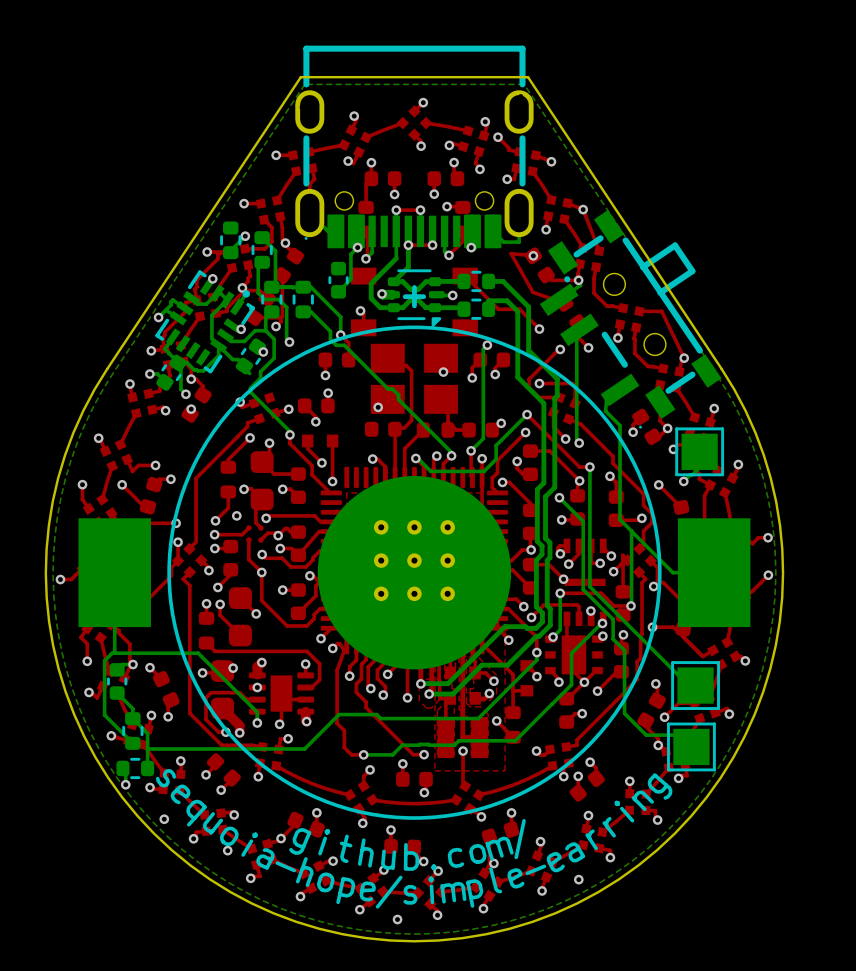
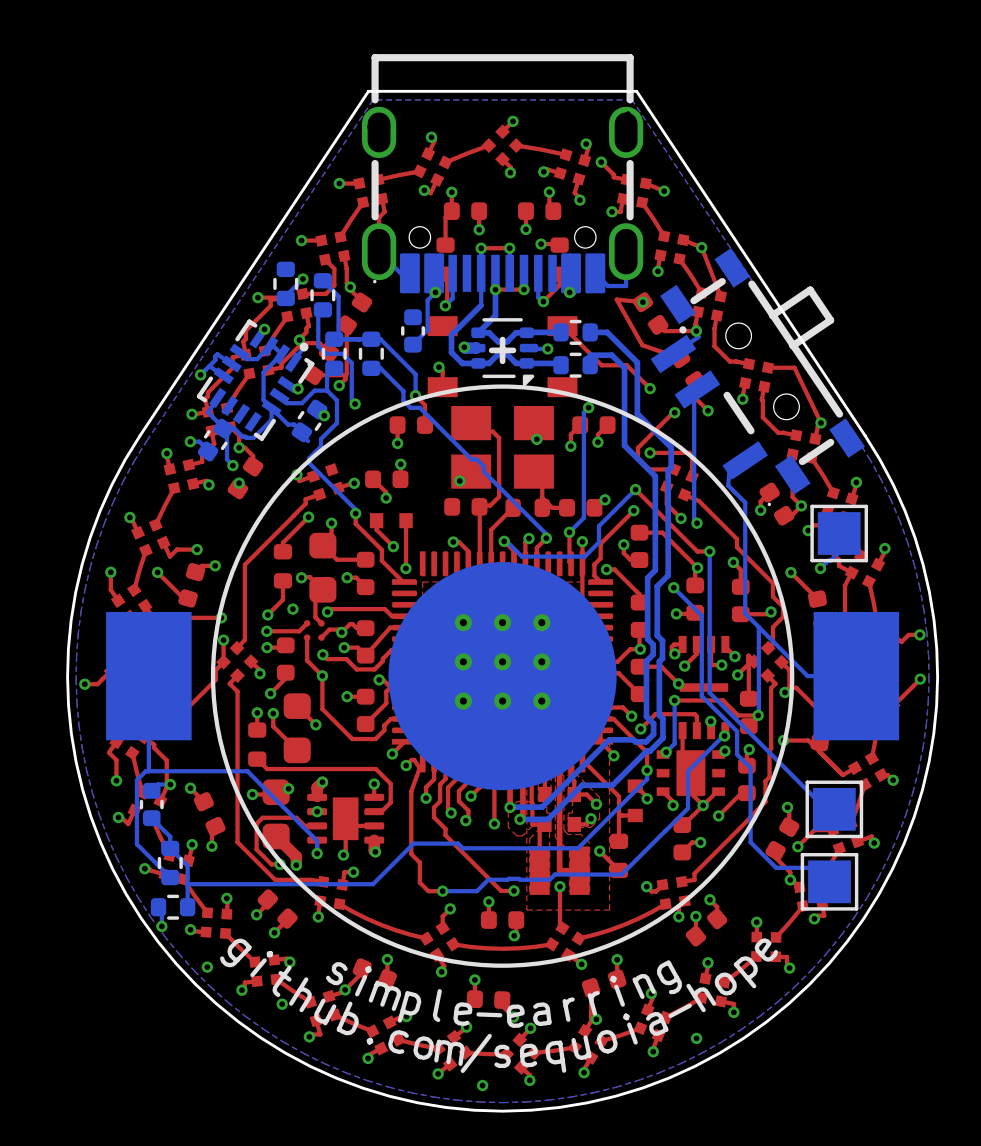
text rotation: 0° (165, 778) -> 21.3° counterclockwise (336, 973)
text position: s (165, 778) -> s (336, 973)
text rotation: 0° (660, 786) -> 19.9° clockwise (669, 977)
text position: g (660, 786) -> g (669, 977)
text: e (180, 794) -> none
text rotation: 0° (642, 800) -> 20.6° clockwise (644, 986)
text position: n (642, 800) -> n (644, 986)
text: none -> e (766, 950)
text: i (624, 811) -> none
text rotation: 0° (196, 813) -> 50.7° counterclockwise (555, 1056)
text position: q (196, 813) -> q (555, 1056)
text: none -> i (261, 964)
text rotation: 0° (212, 823) -> 10.9° counterclockwise (325, 1012)
text position: u (212, 823) -> u (325, 1012)
text: none -> p (745, 972)
text: r (609, 827) -> none
text: none -> i (363, 981)
text: none -> o (725, 984)
text: o (229, 836) -> none
text: none -> i (617, 991)
text: / (520, 839) -> none
text: r (591, 839) -> none
text rotation: 0° (300, 841) -> 20.9° clockwise (235, 952)
text position: g (300, 841) -> g (235, 952)
text: i (324, 842) -> m (384, 995)
text: i (249, 844) -> h (300, 994)
text: none -> h (701, 997)
text rotation: 0° (346, 848) -> 21.8° clockwise (282, 981)
text position: t (346, 848) -> t (282, 981)
text: m (499, 848) -> none
text: none -> r (593, 1003)
text: h (365, 852) -> none
text rotation: 0° (575, 852) -> 5.9° clockwise (657, 1023)
text rotation: 0° (477, 853) -> 3.3° counterclockwise (607, 1041)
text: none -> r (568, 1009)
text: b (411, 856) -> none
text rotation: 0° (455, 857) -> 24.2° clockwise (398, 1042)
text position: c (455, 857) -> c (398, 1042)
text: a (265, 859) -> none
text: none -> e (462, 1014)
text: u (388, 859) -> none
text: none -> - (489, 1014)
text: none -> a (542, 1014)
text: none -> e (515, 1016)
text: e (555, 862) -> none
text: - (285, 866) -> b (347, 1018)
text: . (433, 867) -> none
text rotation: 0° (535, 869) -> 5.7° counterclockwise (680, 1010)
text: h (304, 872) -> . (369, 1041)
text: e (515, 878) -> i (630, 1029)
text rotation: 0° (495, 880) -> 25.7° clockwise (437, 1005)
text position: l (495, 880) -> l (437, 1005)
text rotation: 0° (325, 882) -> 4° counterclockwise (423, 1048)
text rotation: 0° (345, 890) -> 3.5° clockwise (409, 1006)
text: i (431, 890) -> e (528, 1055)
text: e (367, 891) -> m (449, 1052)
text rotation: 0° (389, 892) -> 0.5° counterclockwise (476, 1053)
text: m (453, 892) -> none
text: p (474, 893) -> u (581, 1047)
text rotation: 0° (410, 894) -> 0.7° counterclockwise (502, 1056)

